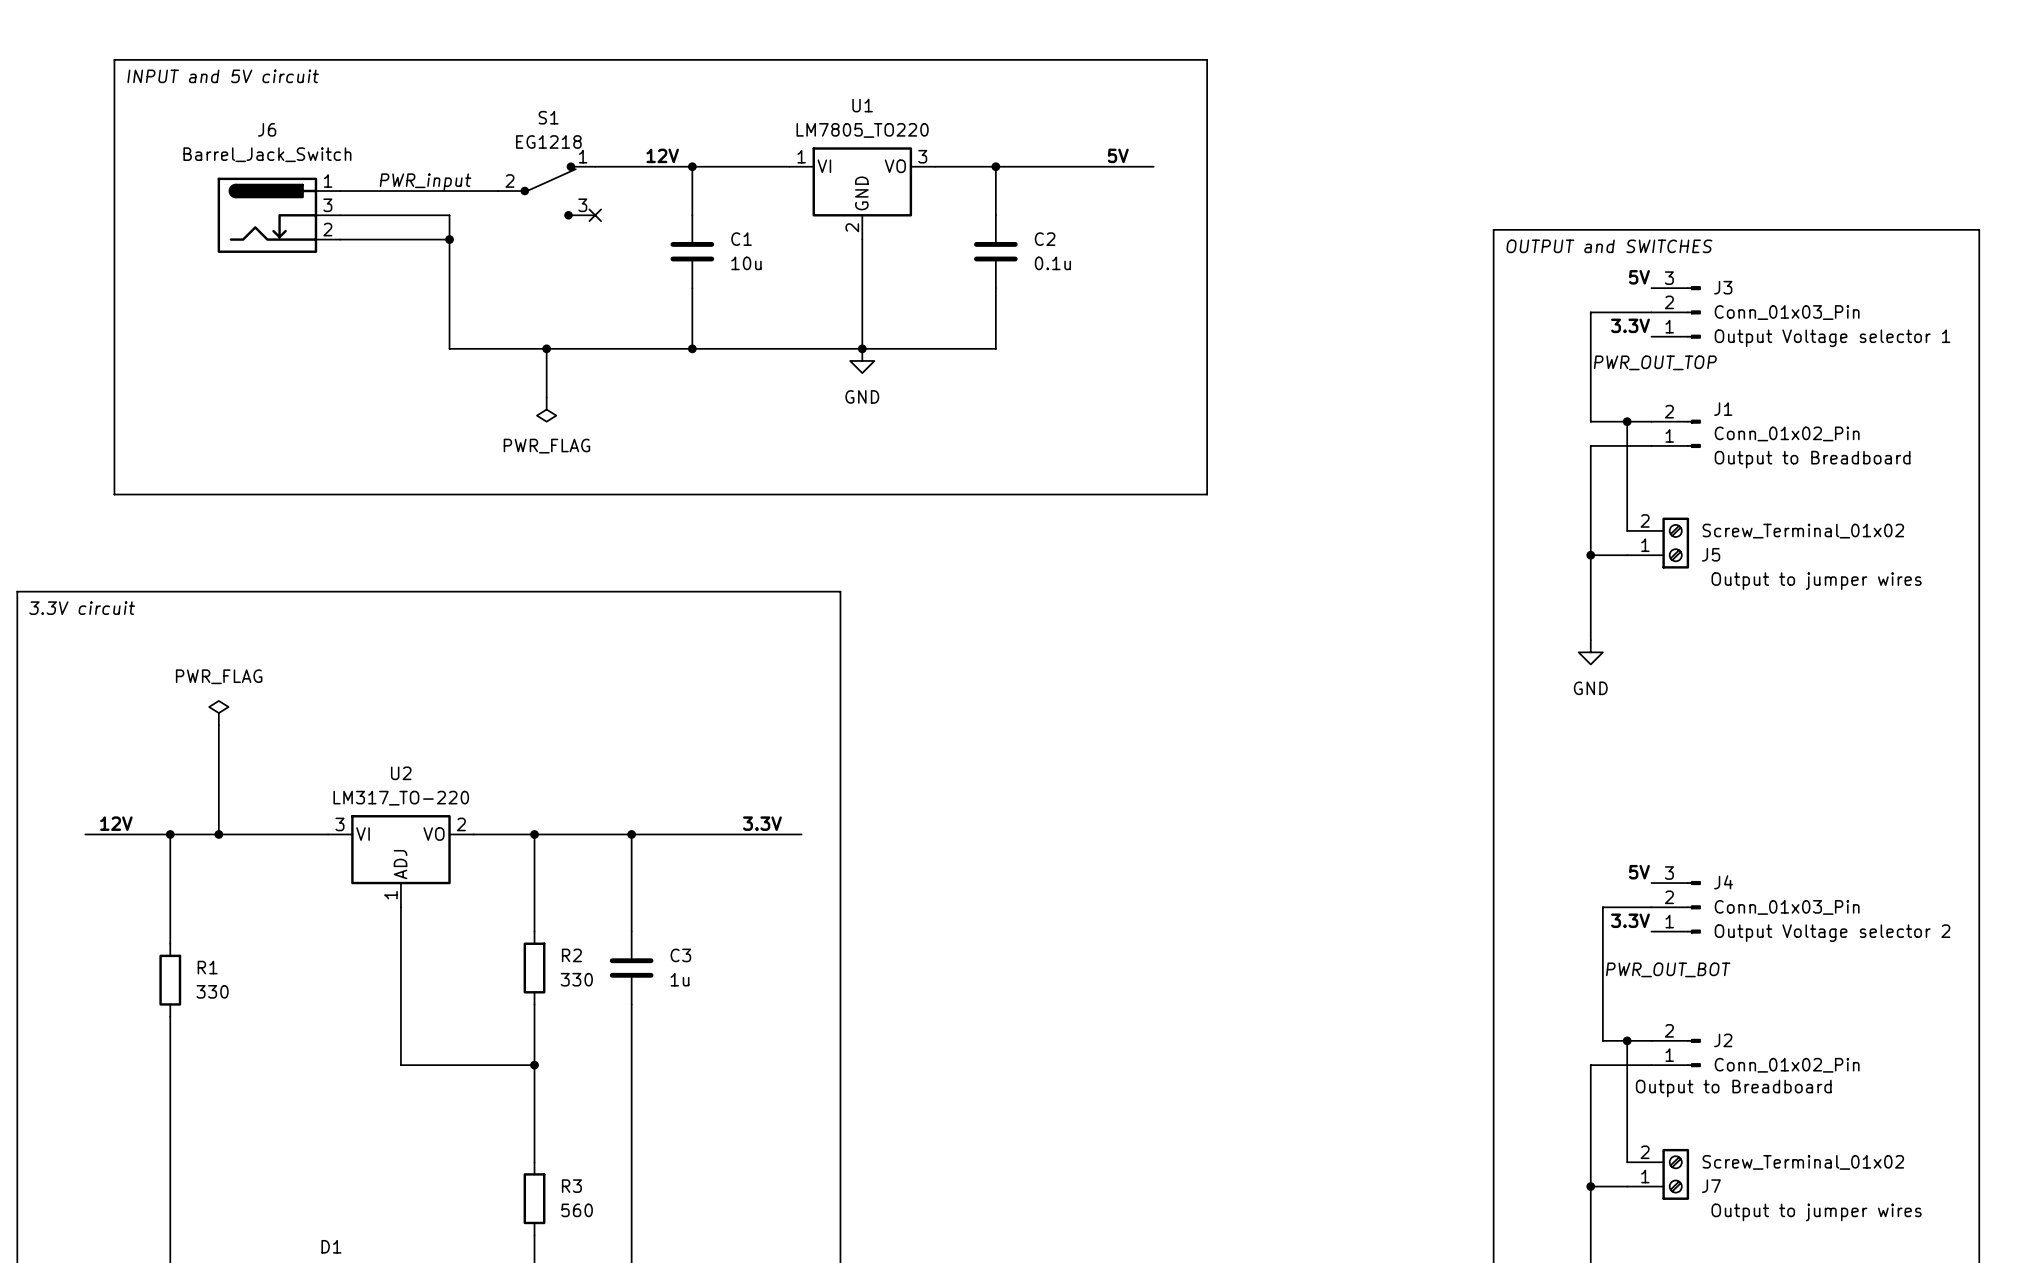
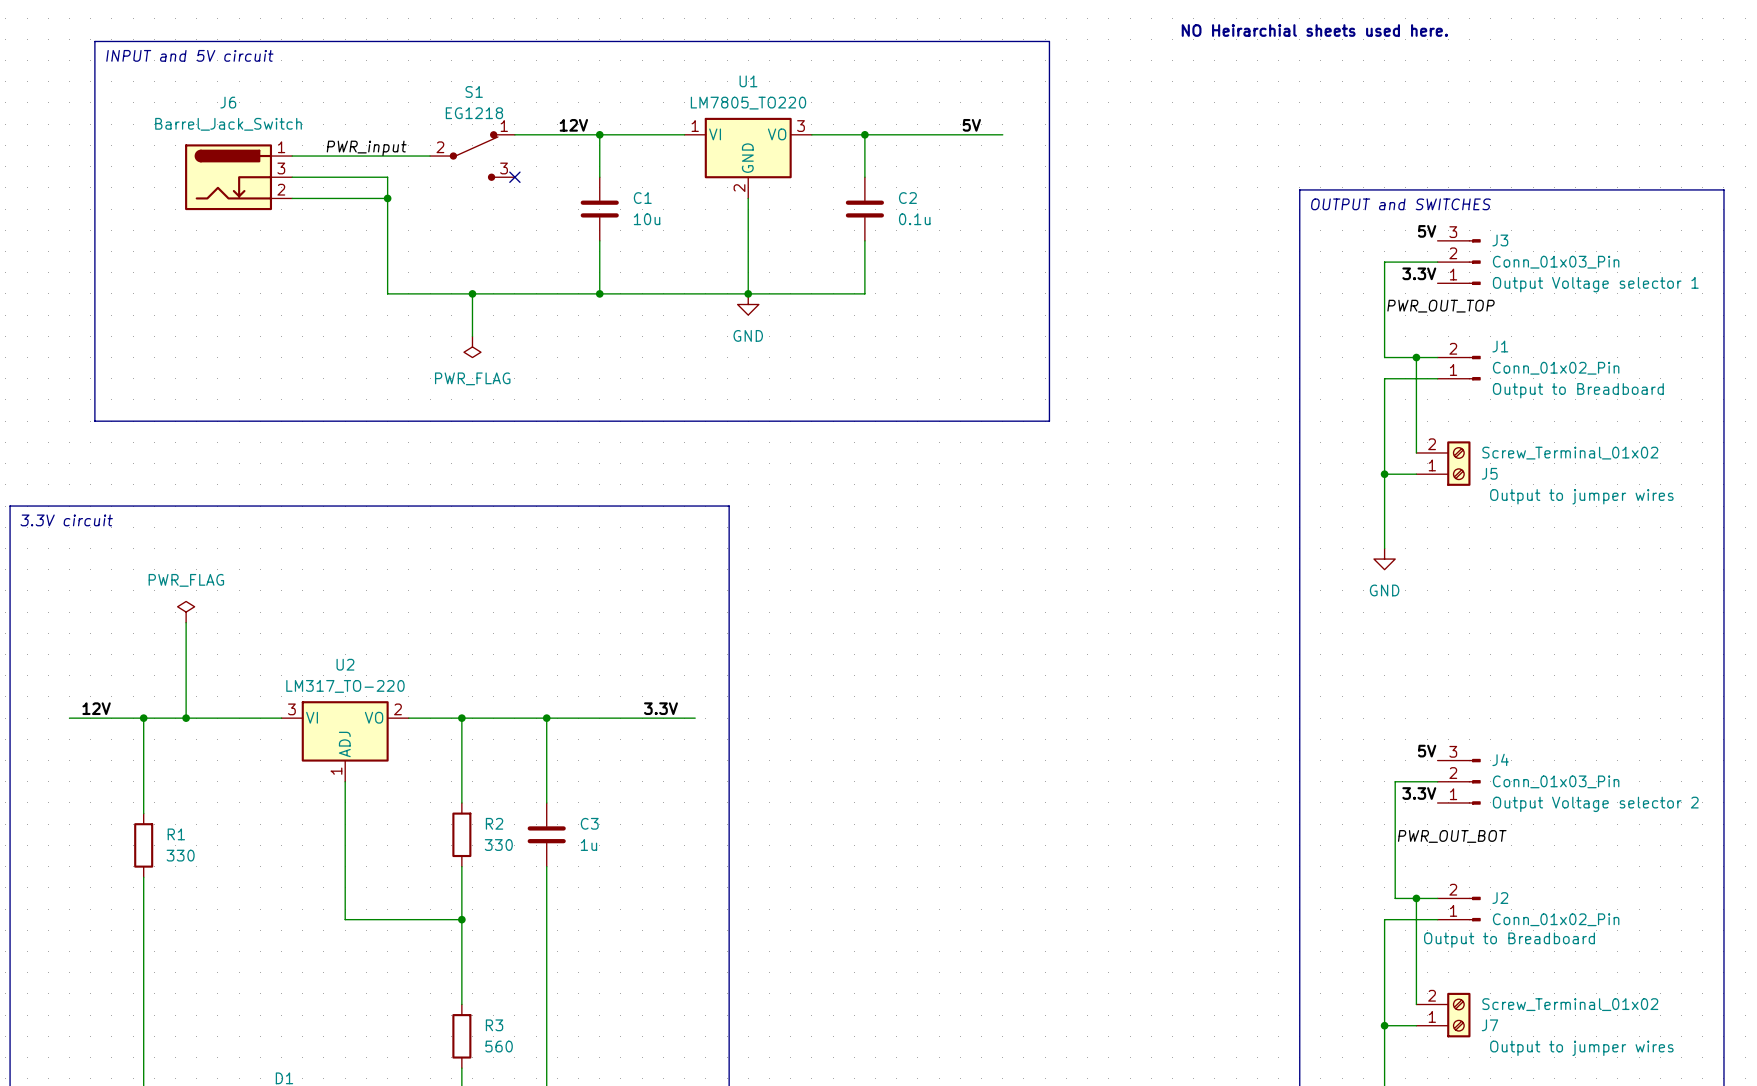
text: none -> NO Heirarchial sheets used here. (1314, 30)

